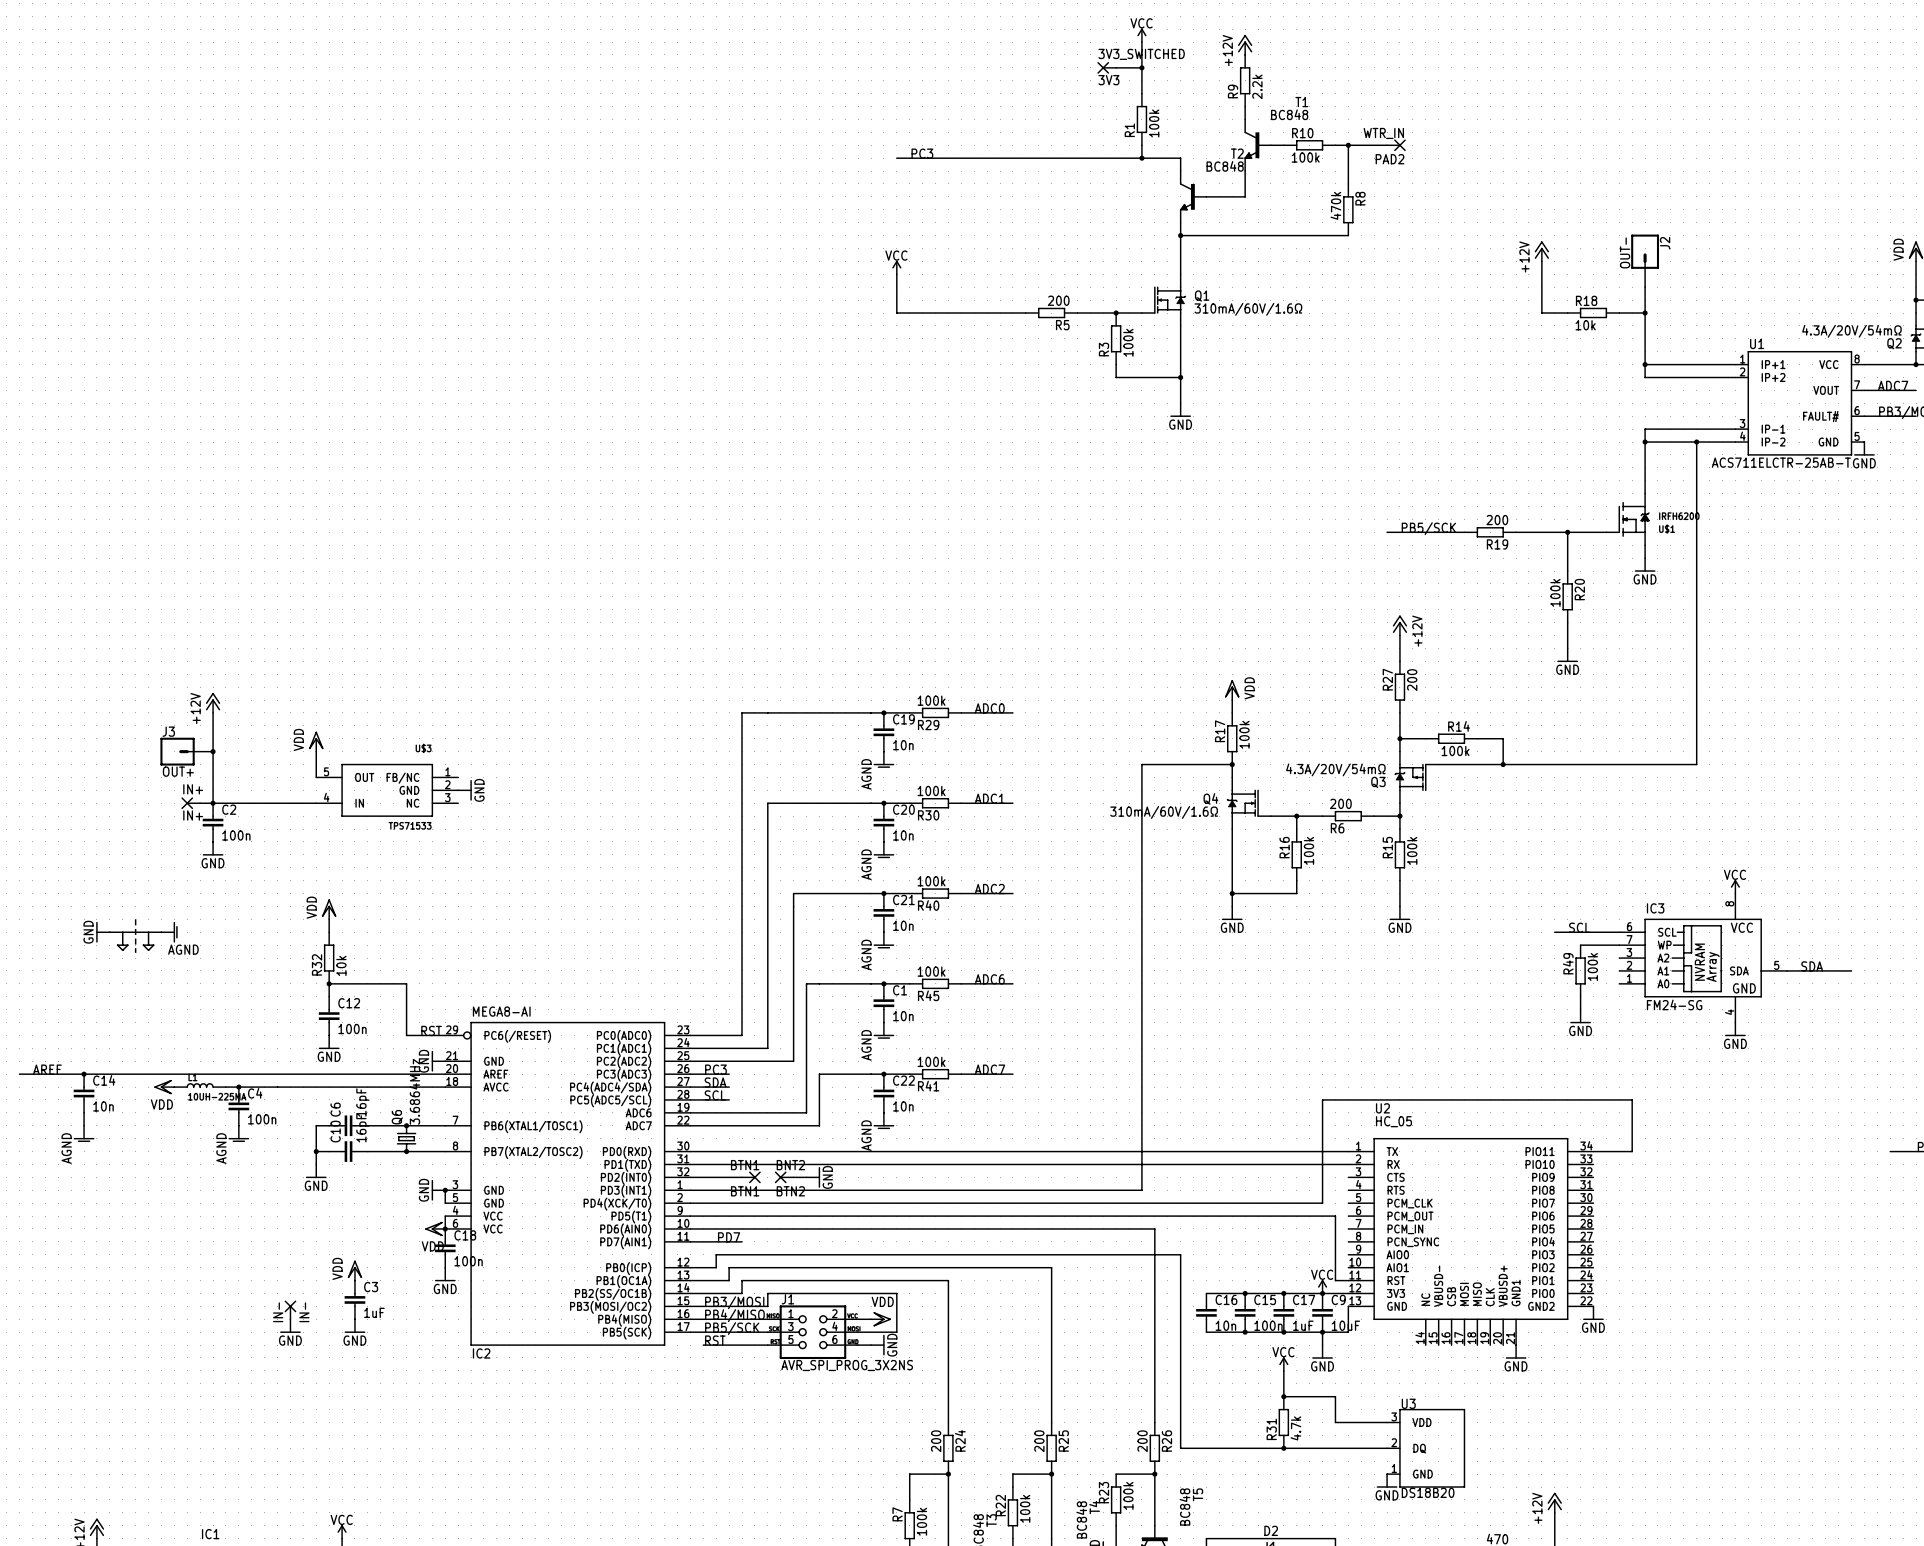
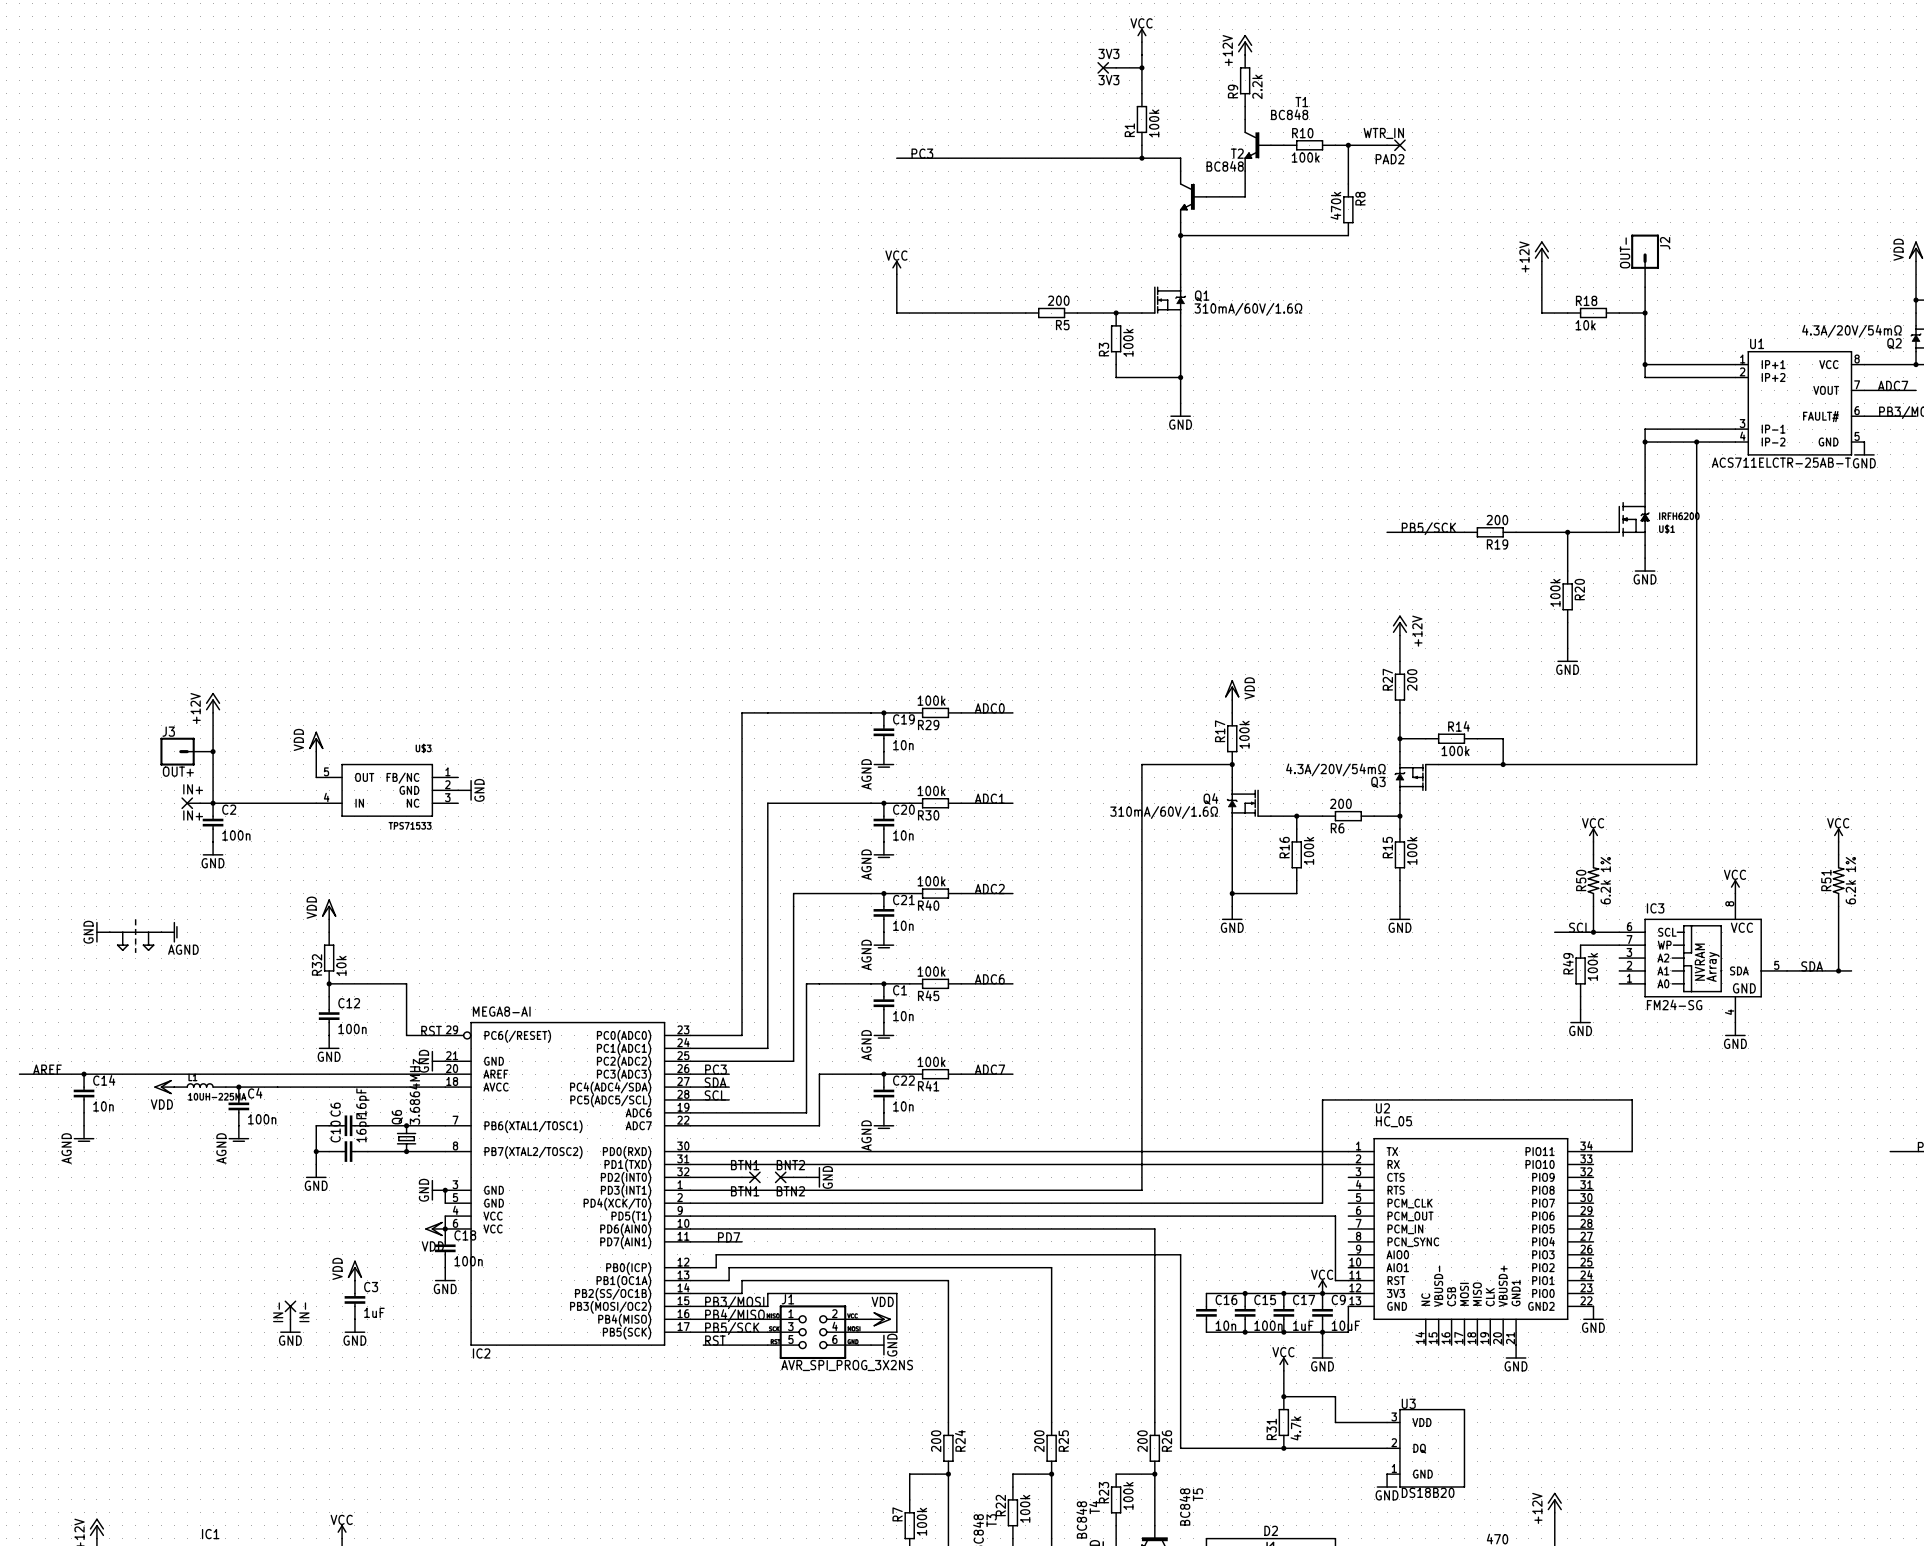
3V3_SWITCHED name: 3V3_SWITCHED (1141, 54) -> 3V3 (1108, 53)
power symbol: none -> VCC (1593, 835)
power symbol: none -> VCC (1838, 835)
wire: none -> (1593, 841) (1593, 854)
wire: none -> (1838, 841) (1838, 854)
R50: none -> 6.2k 1% (1593, 880)
R51: none -> 6.2k 1% (1838, 880)
wire: none -> (1593, 906) (1593, 932)
wire: none -> (1838, 906) (1838, 970)
junction: none -> (1593, 932)
junction: none -> (1838, 970)

